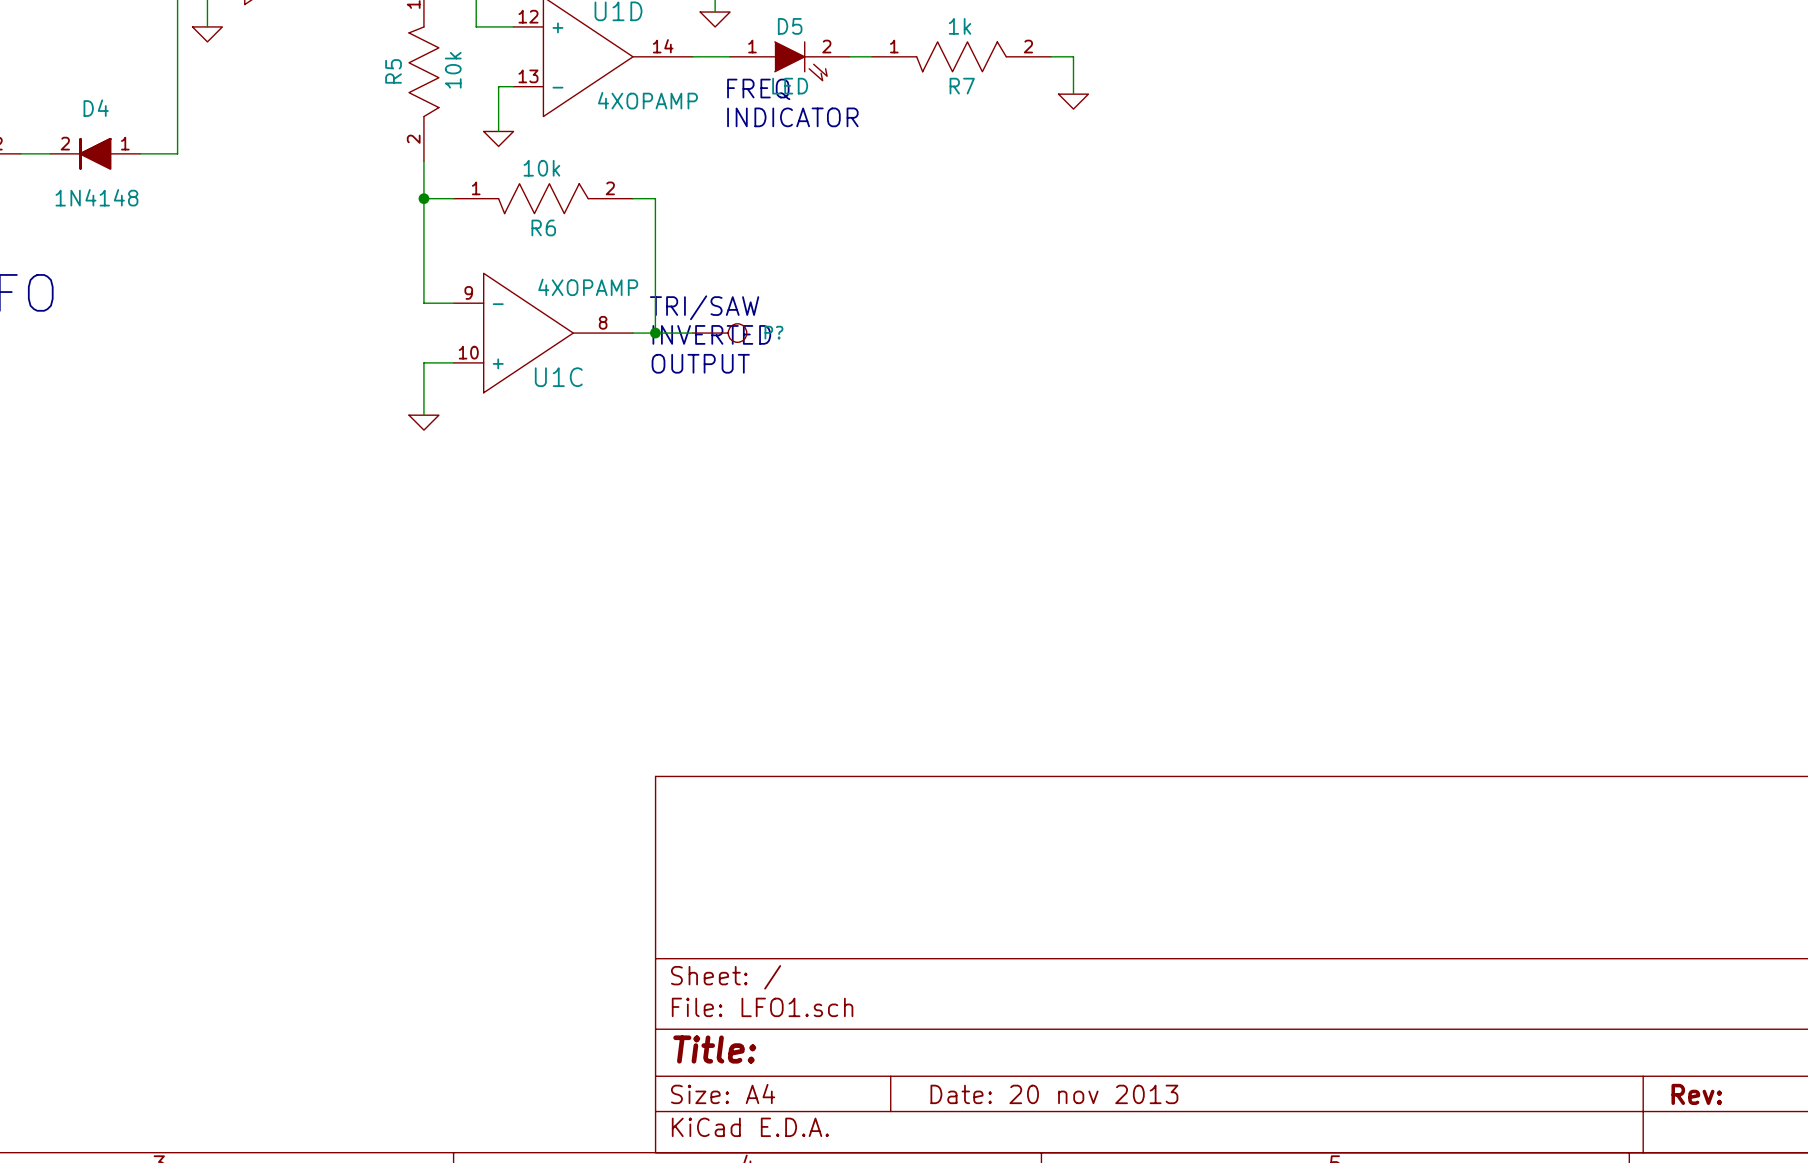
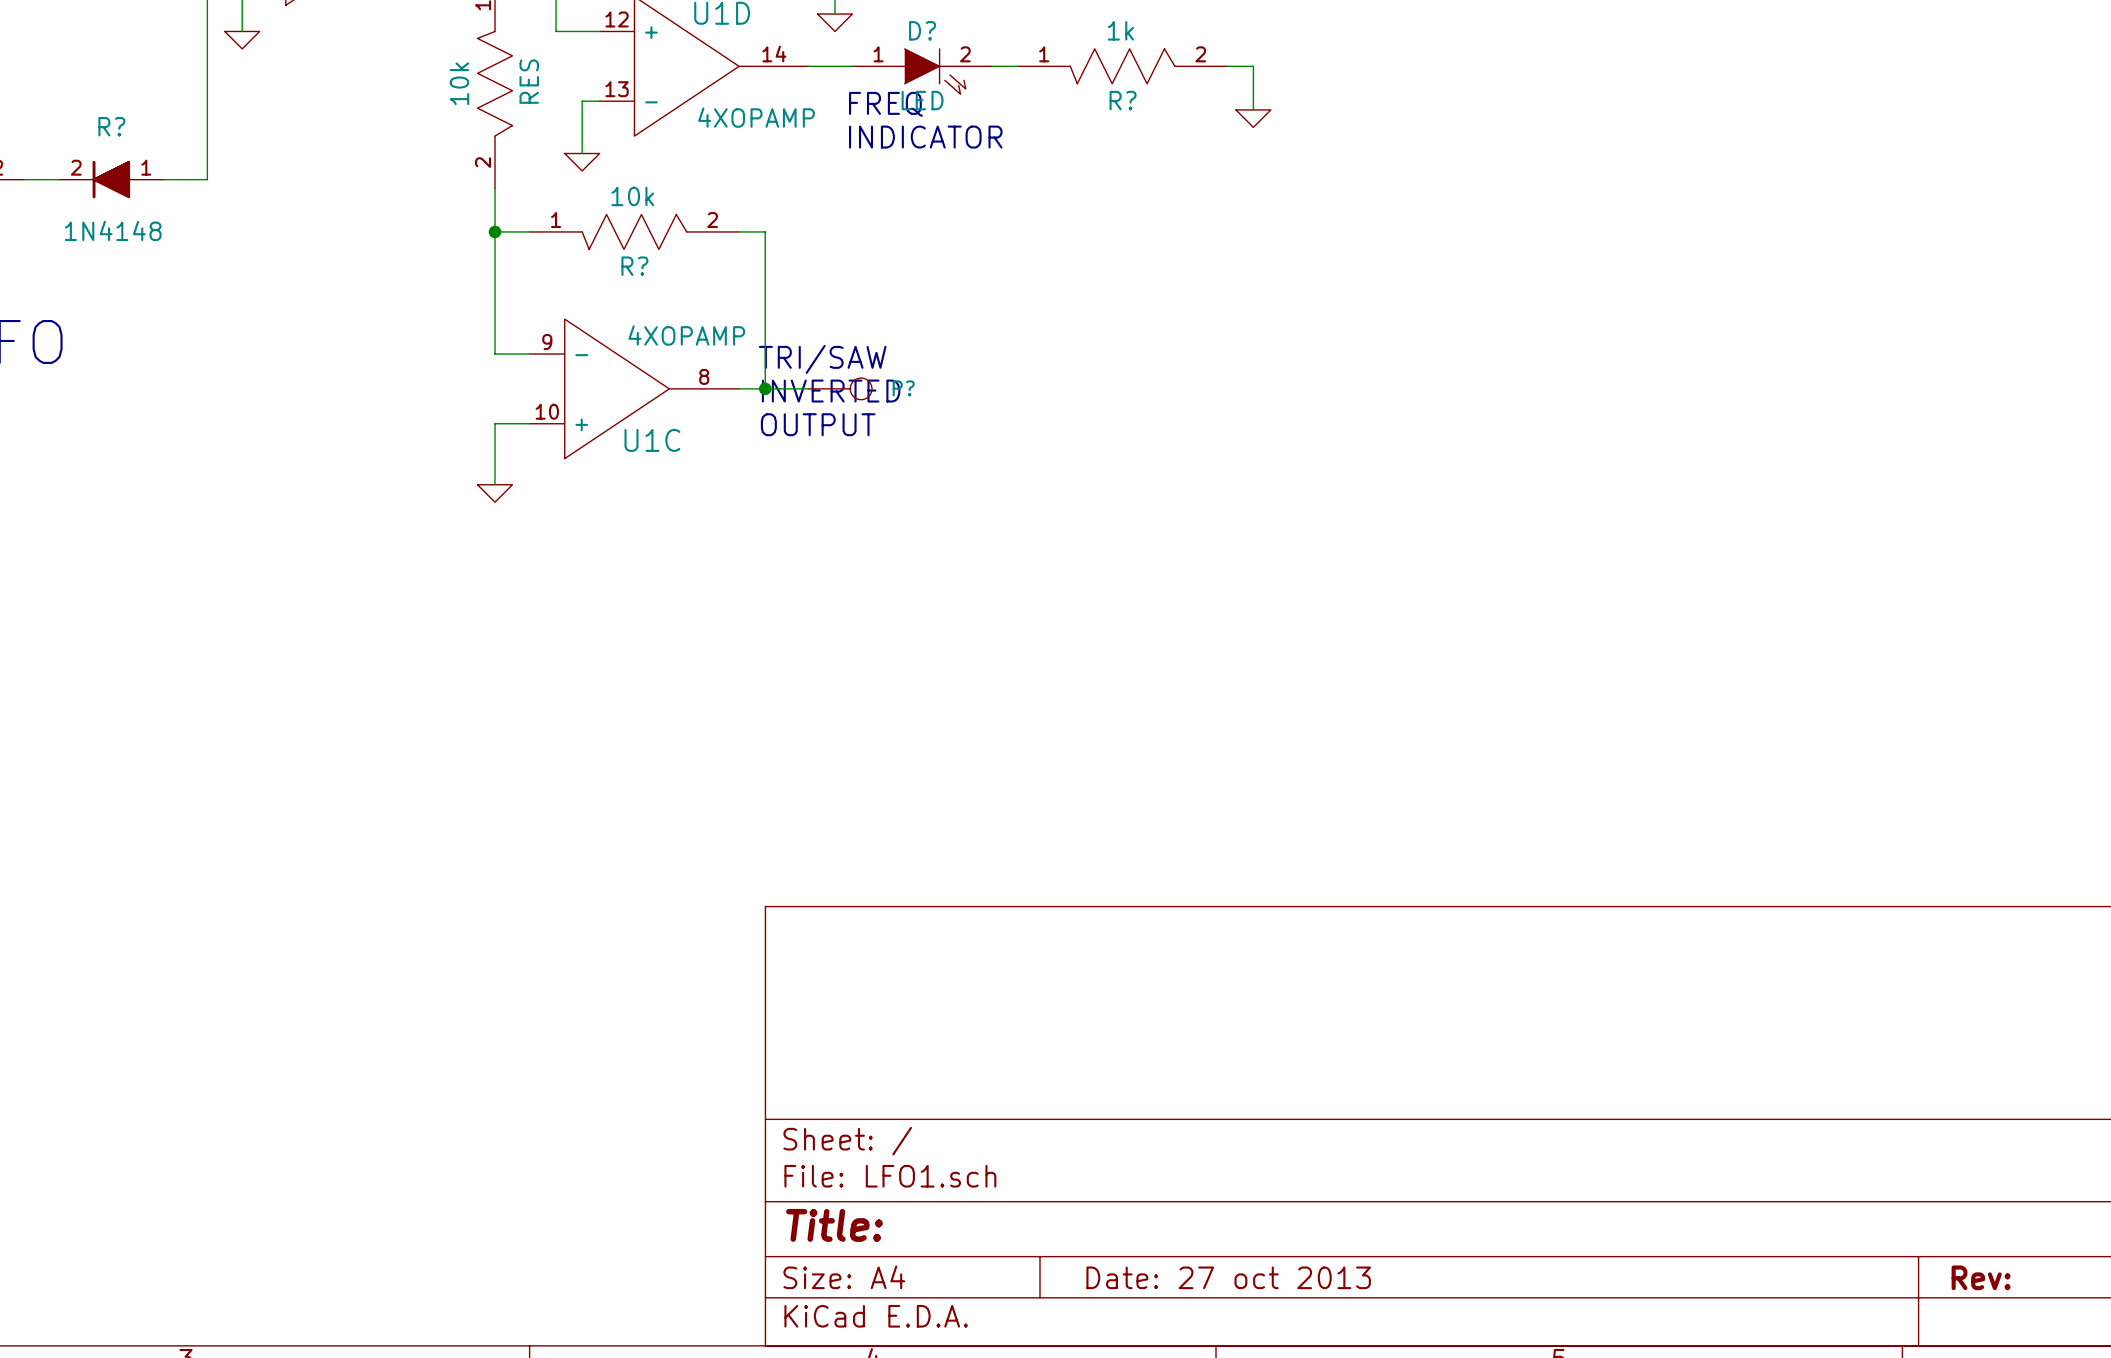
D5 name: D5 (790, 26) -> D? (922, 30)
R5 value: 10k (453, 70) -> RES (529, 81)
R5 name: R5 (393, 71) -> 10k (459, 83)
R7 name: R7 (962, 86) -> R? (1123, 100)
D4 name: D4 (96, 108) -> R? (111, 126)
R6 name: R6 (543, 227) -> R? (634, 266)
title block: Date: 20 nov 2013 (1054, 1094) -> Date: 27 oct 2013 (1228, 1277)

